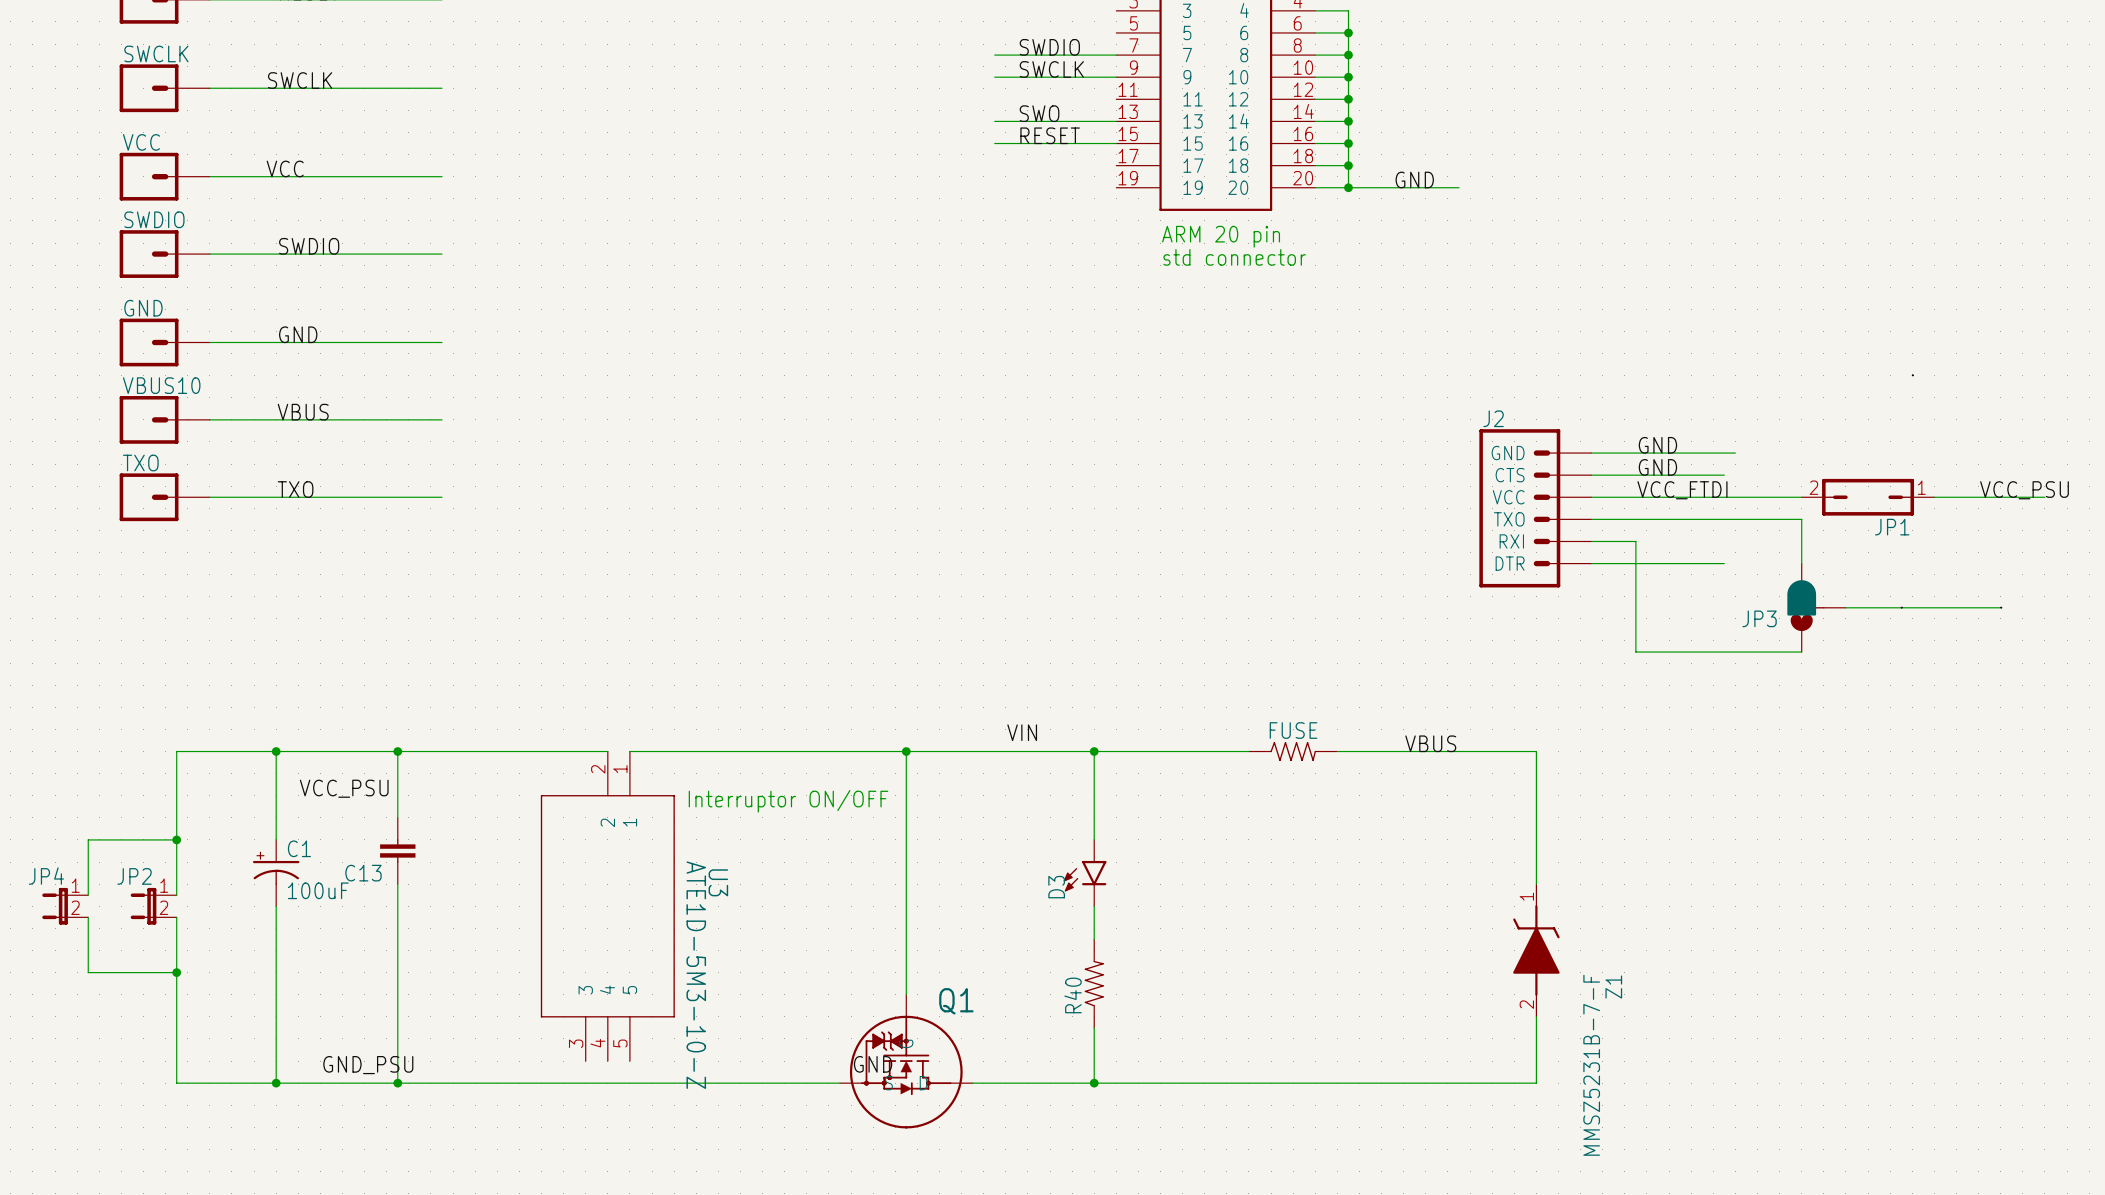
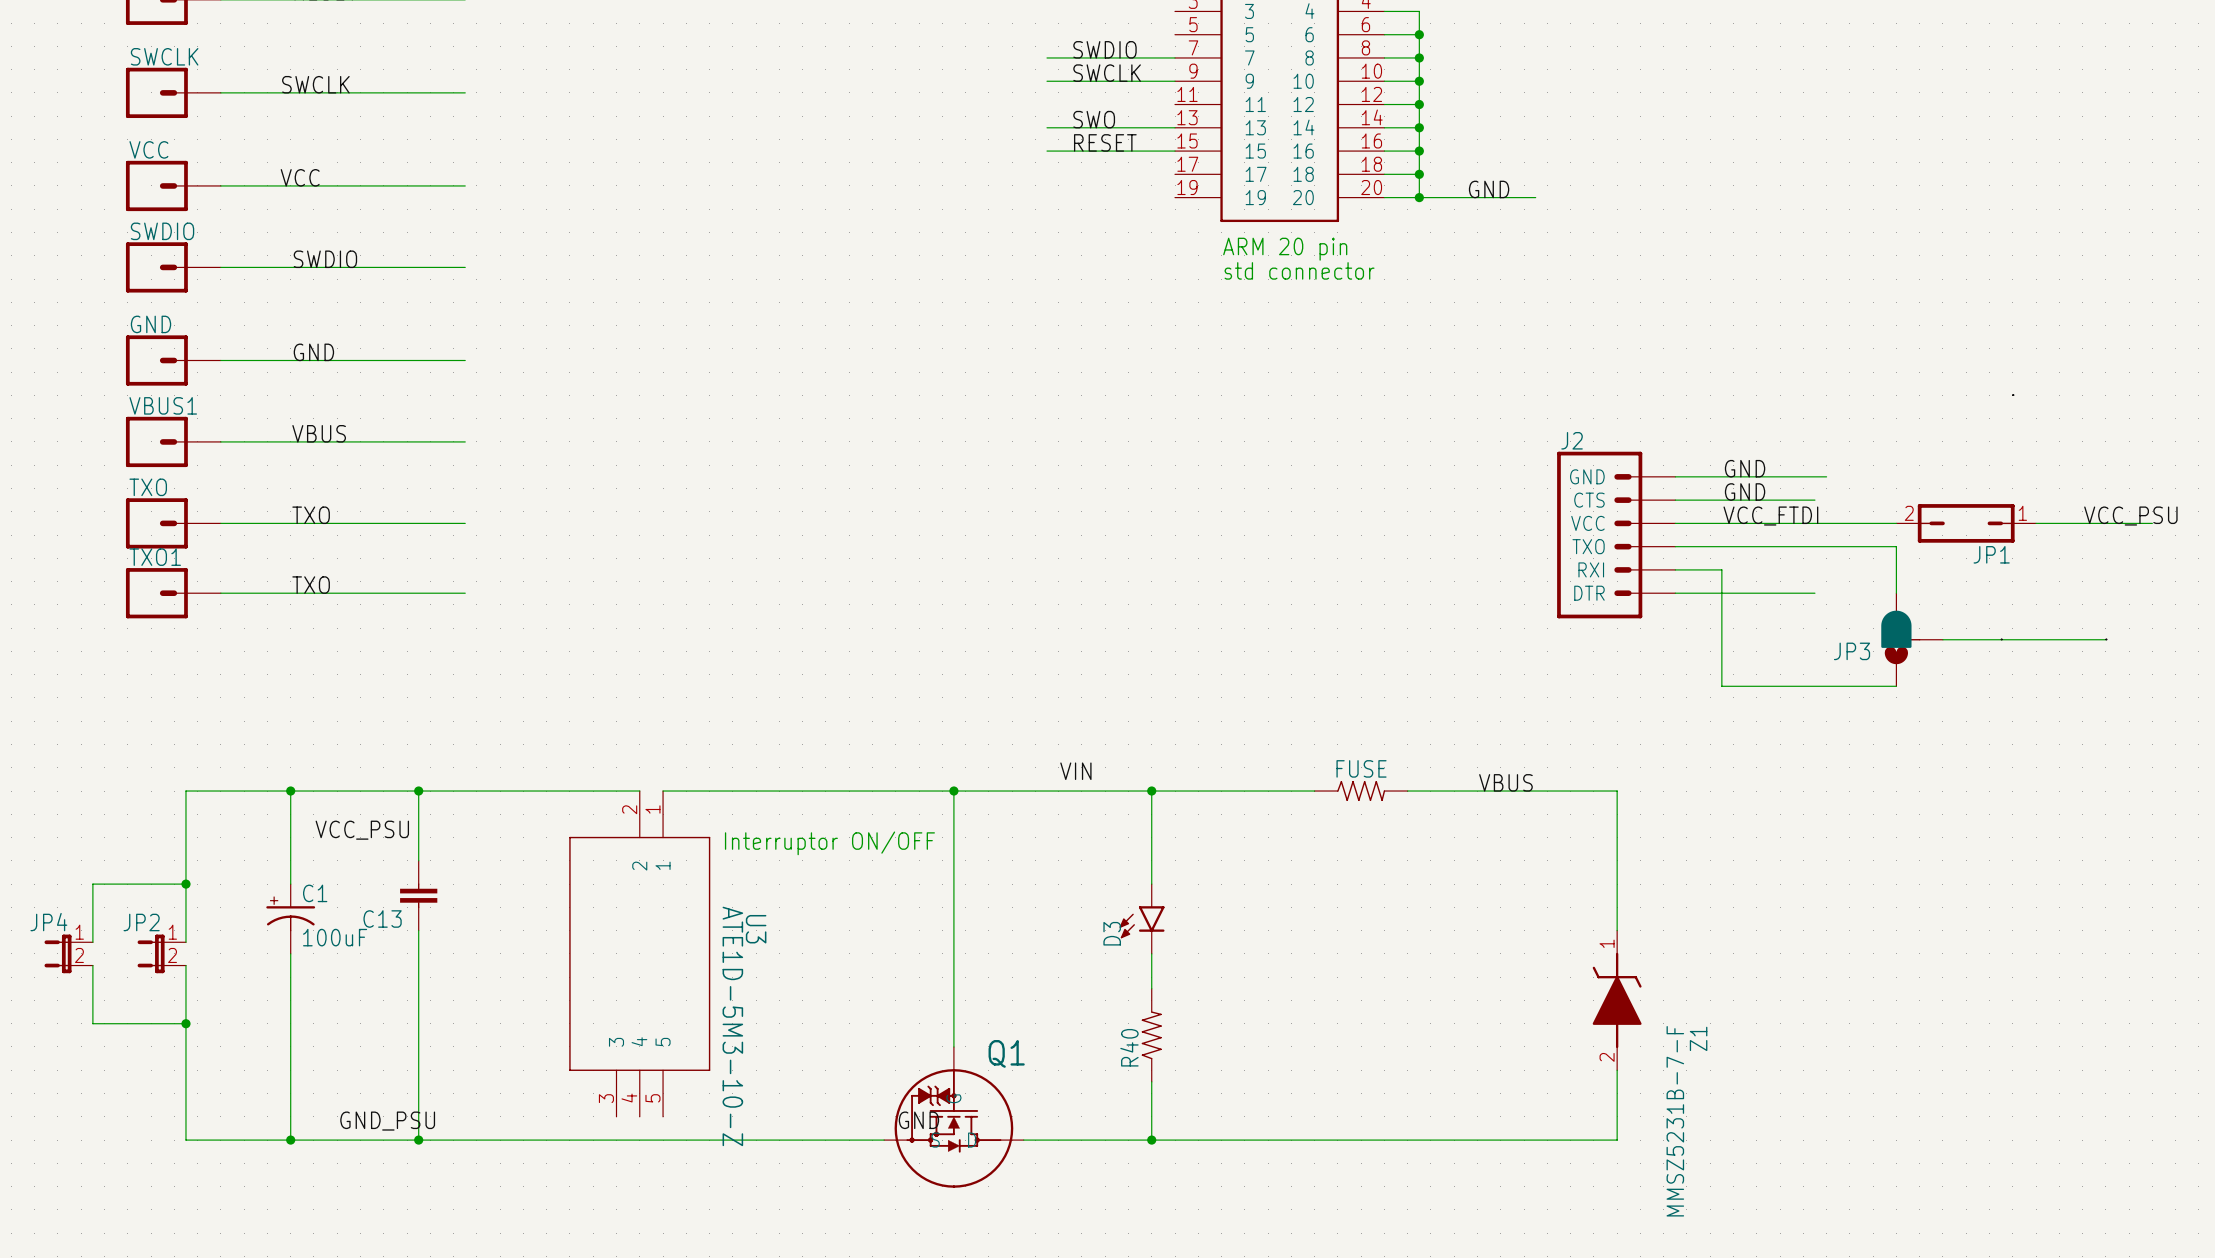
VBUS10 name: VBUS10 (161, 385) -> VBUS1 (163, 405)
label: none -> TXO (311, 585)
TXO1: none -> (173, 593)
wire: none -> (220, 593) (465, 593)

